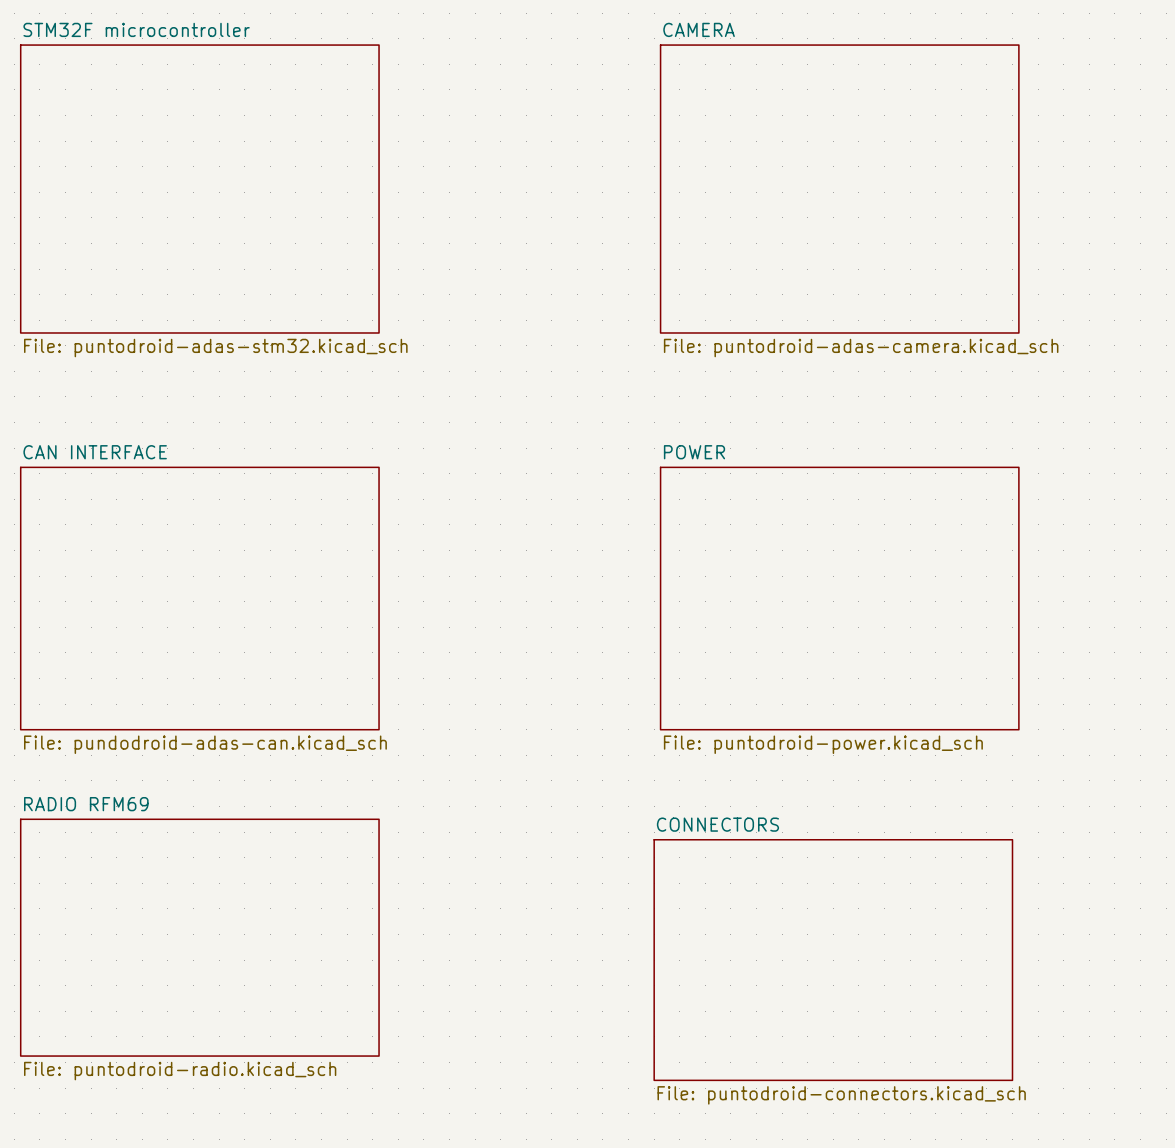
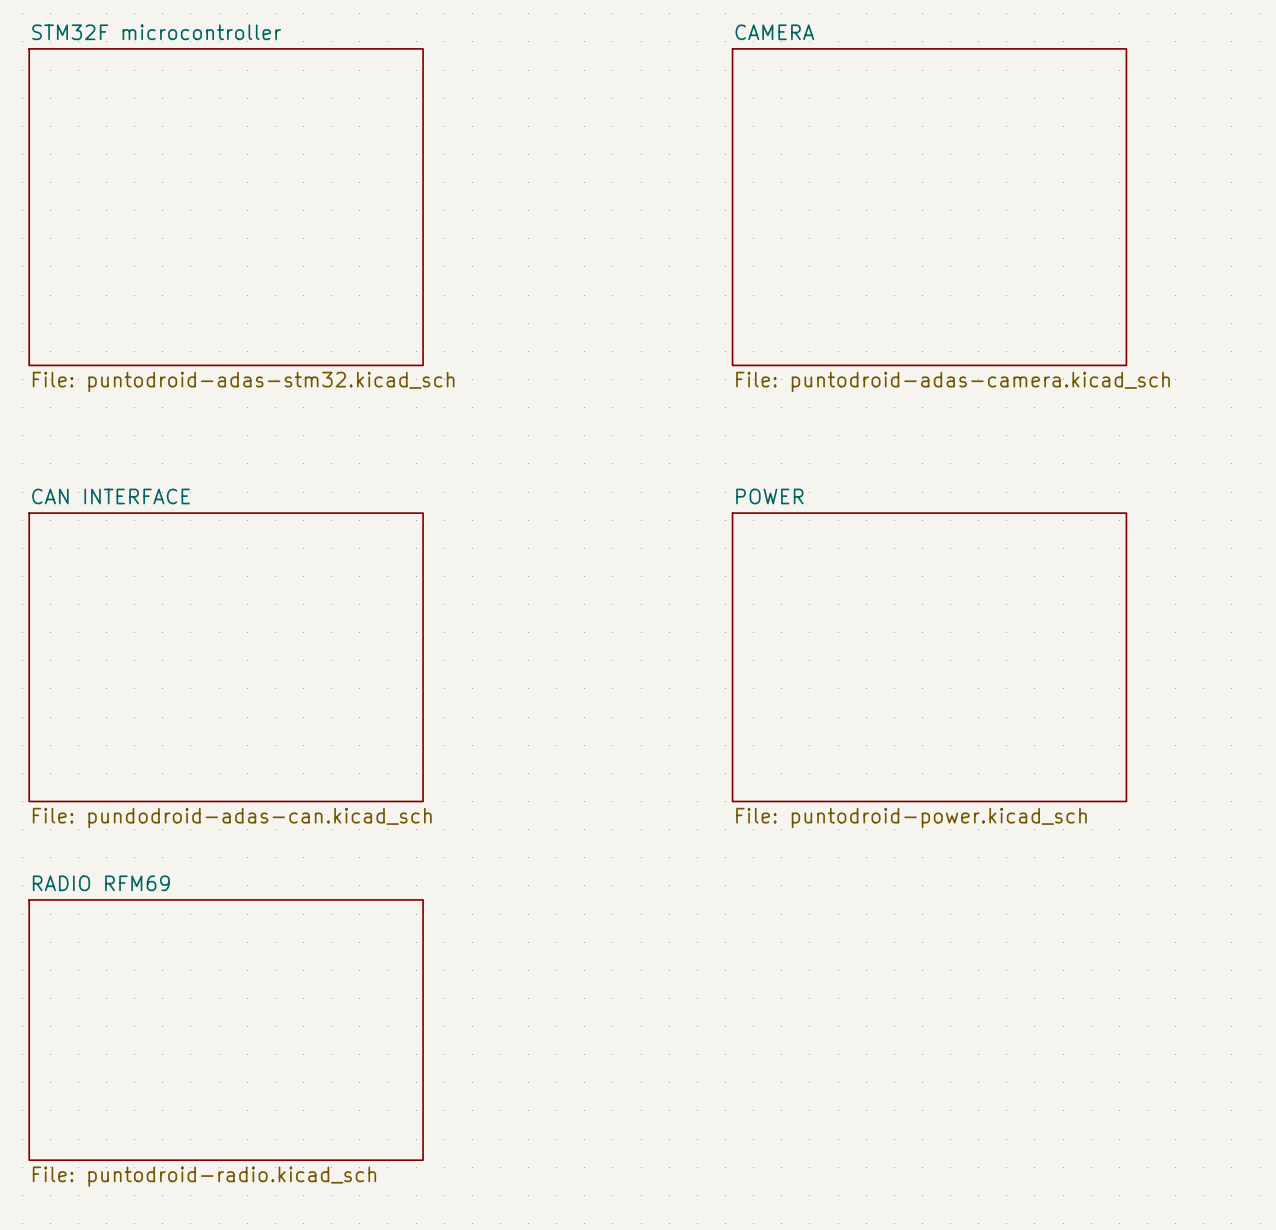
sheet CONNECTORS: File: puntodroid-connectors.kicad_sch (833, 960) -> none

